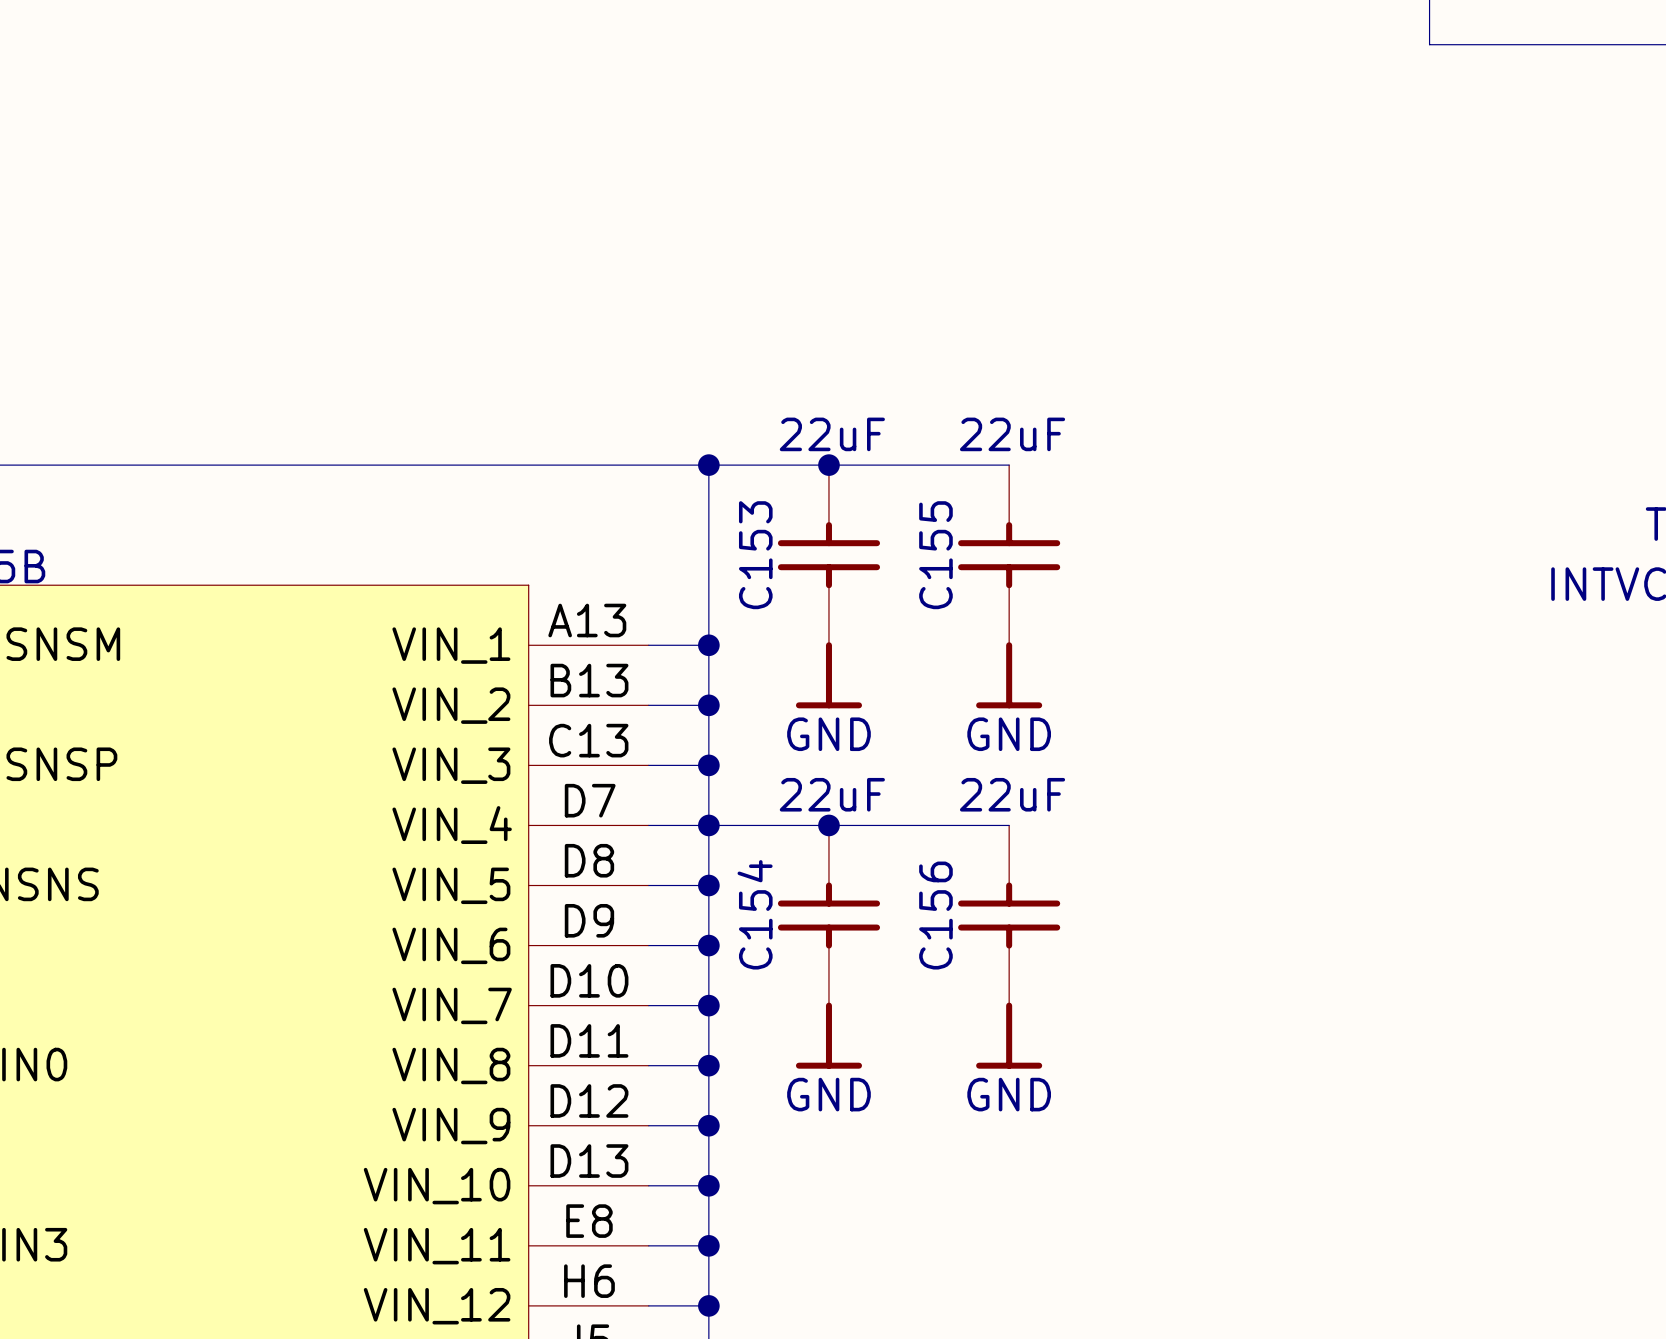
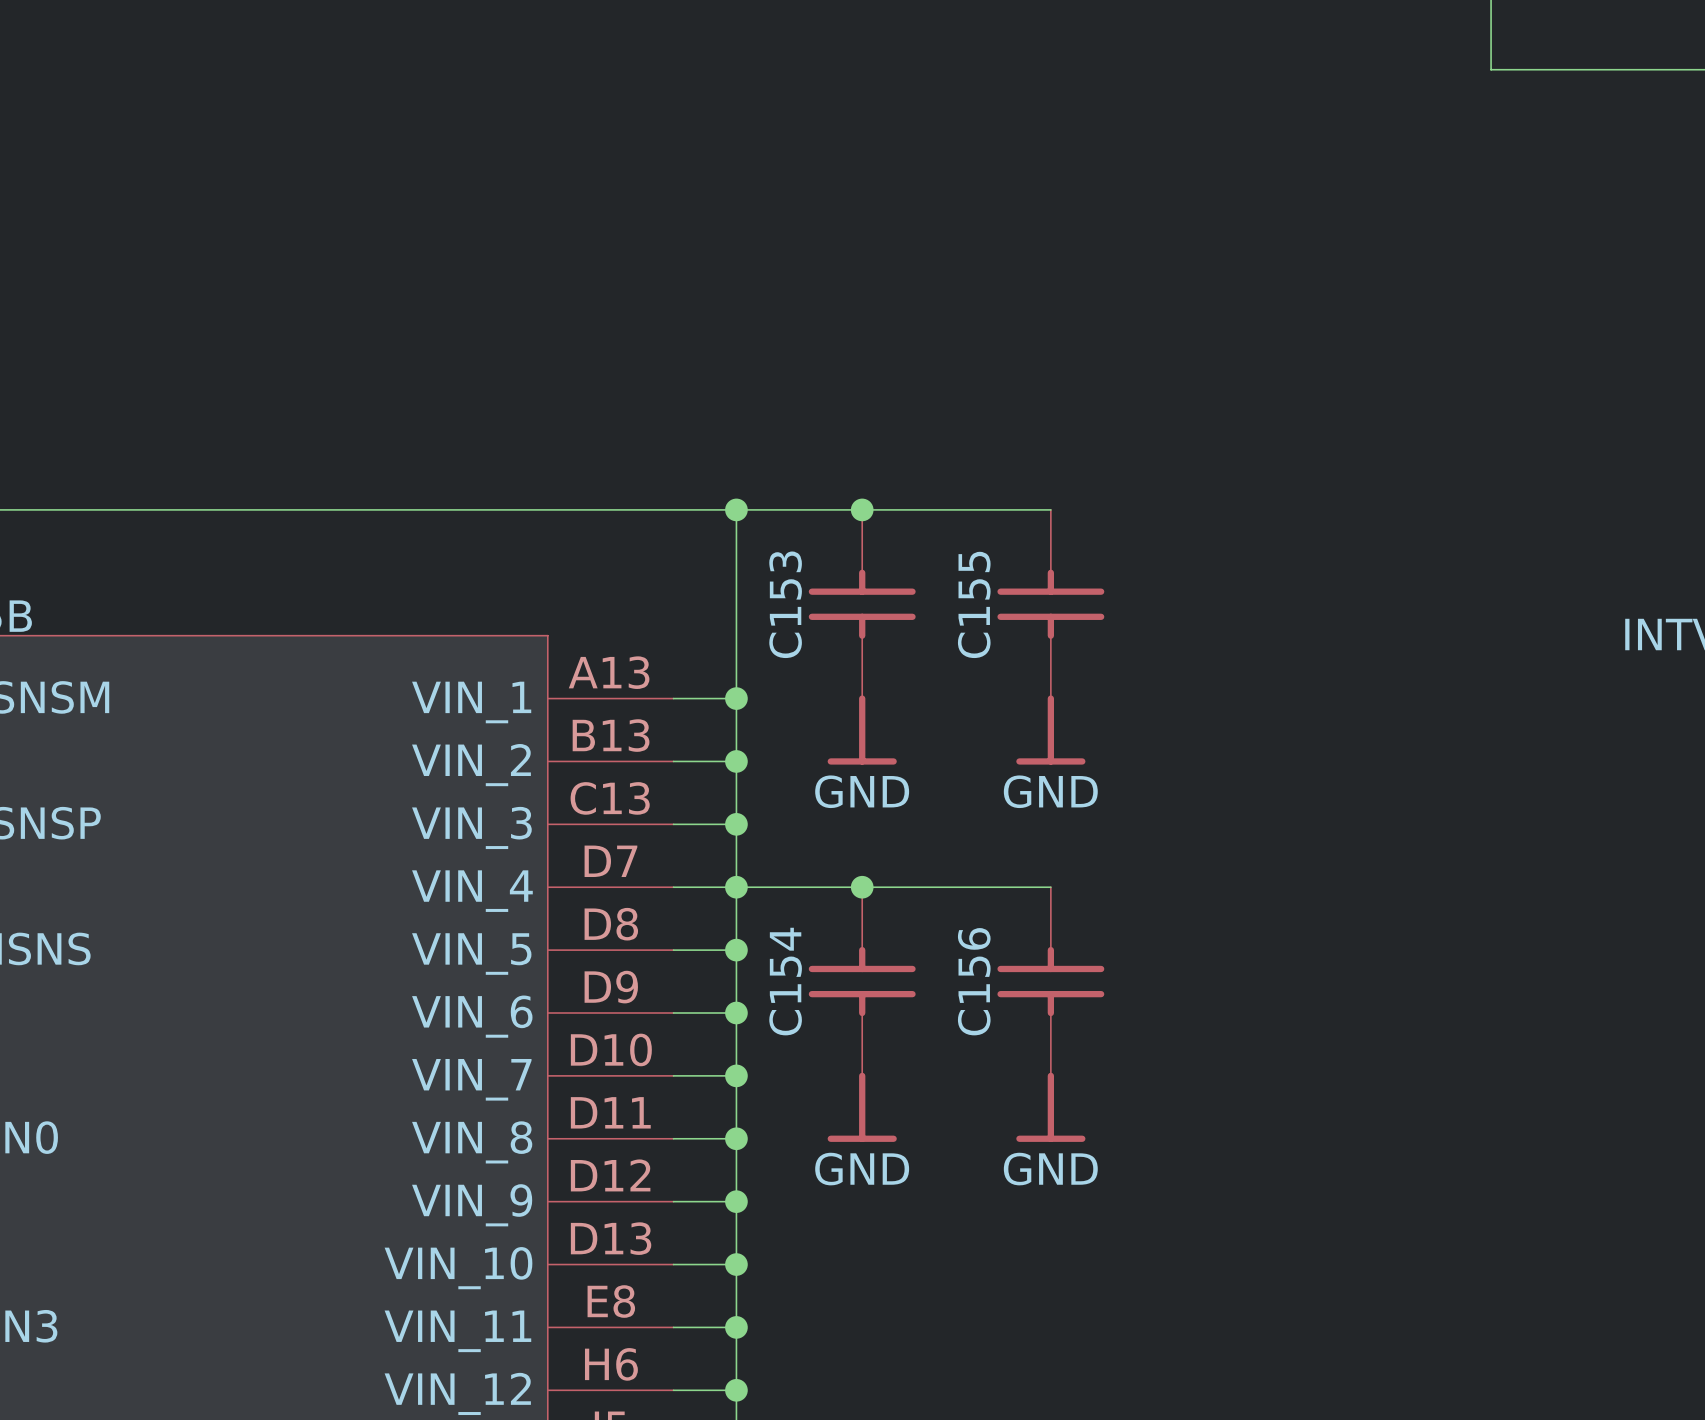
C153 text: 22uF (832, 434) -> none
C155 text: 22uF (1012, 434) -> none
C154 text: 22uF (832, 794) -> none
C156 text: 22uF (1012, 794) -> none

